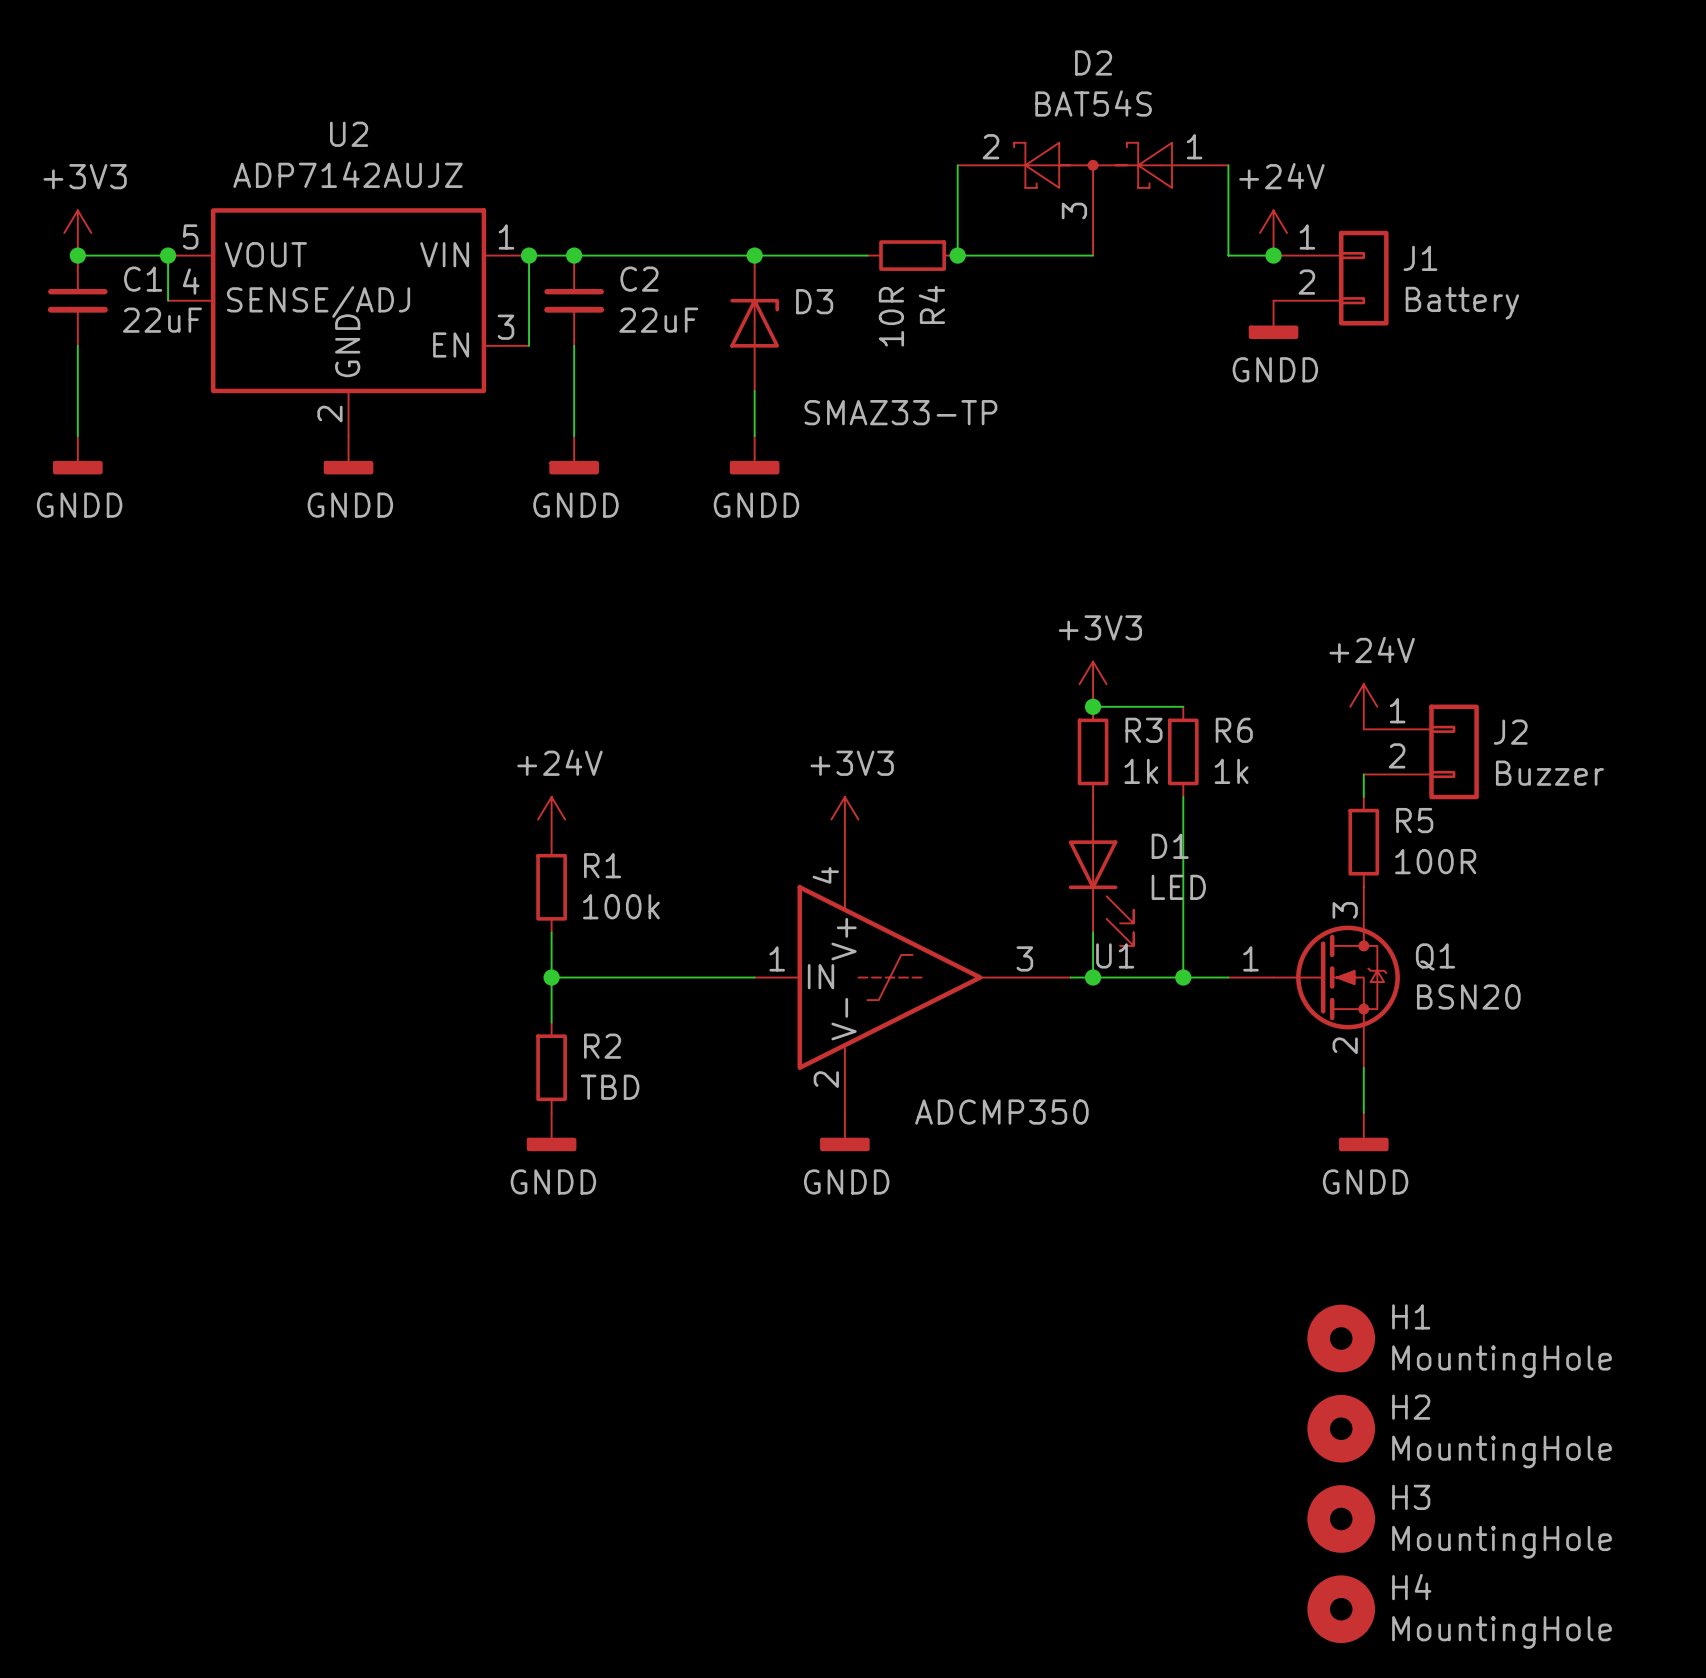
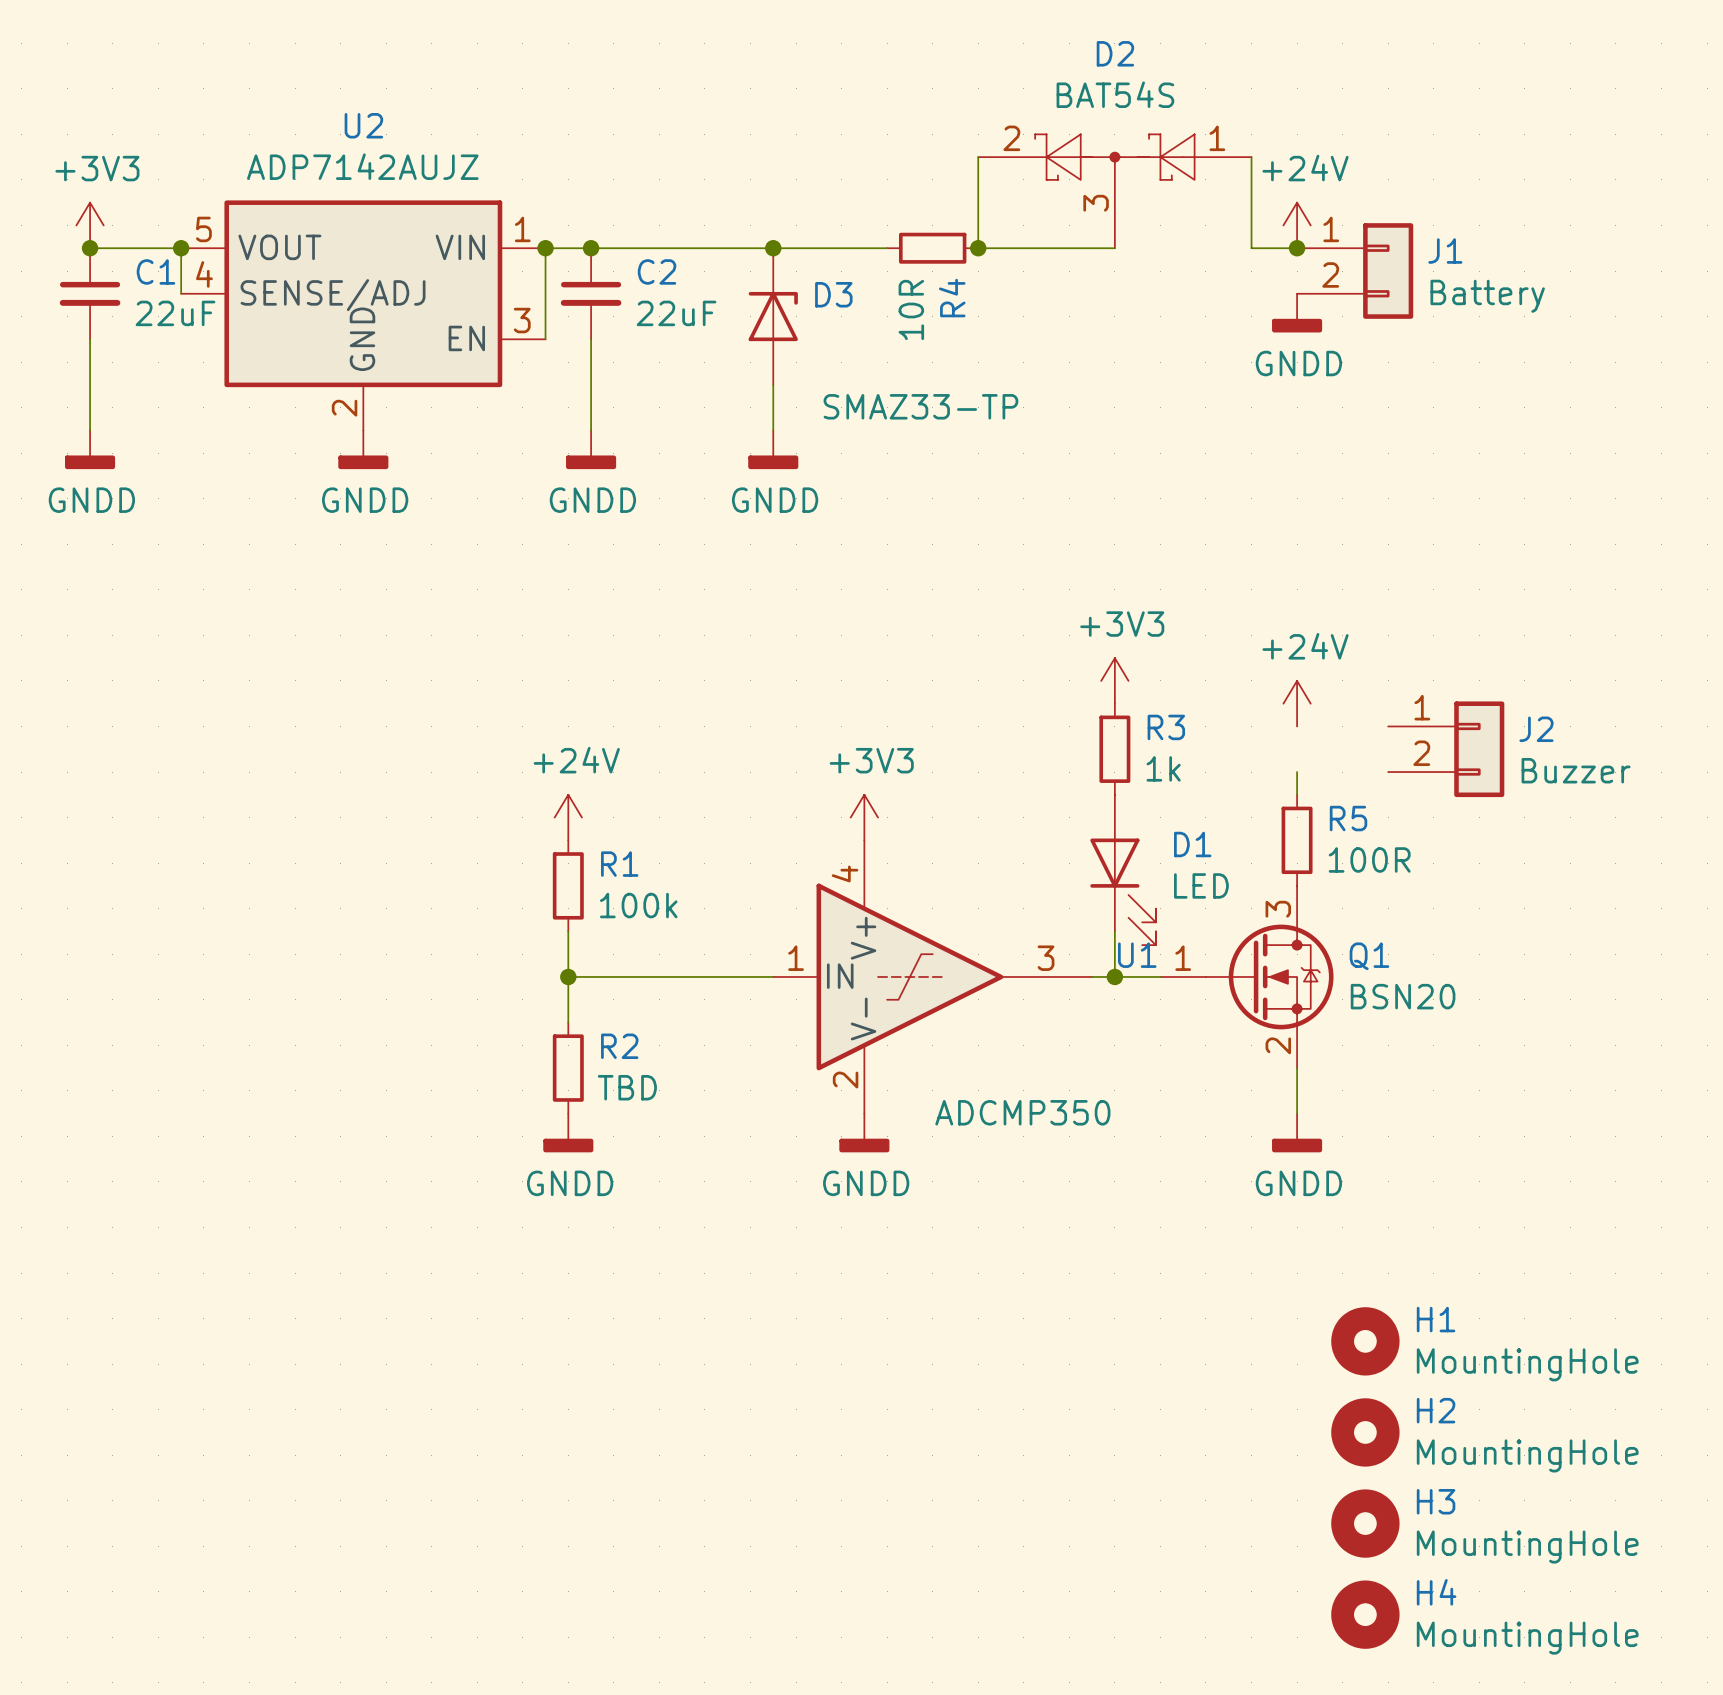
wire: (1093, 706) (1183, 706) -> none
junction: (1093, 706) -> none
power symbol position: +24V (1363, 706) -> +24V (1297, 703)
R6: 1k (1183, 751) -> none
wire: (1363, 774) (1363, 797) -> (1297, 772) (1297, 794)
wire: (1183, 797) (1183, 977) -> none
R5 position: (1363, 842) -> (1297, 840)
junction: (1183, 977) -> none
Q1 position: (1314, 977) -> (1246, 976)
wire: (1363, 1067) (1363, 1112) -> (1297, 1068) (1297, 1113)
power symbol position: GNDD (1363, 1132) -> GNDD (1297, 1132)

